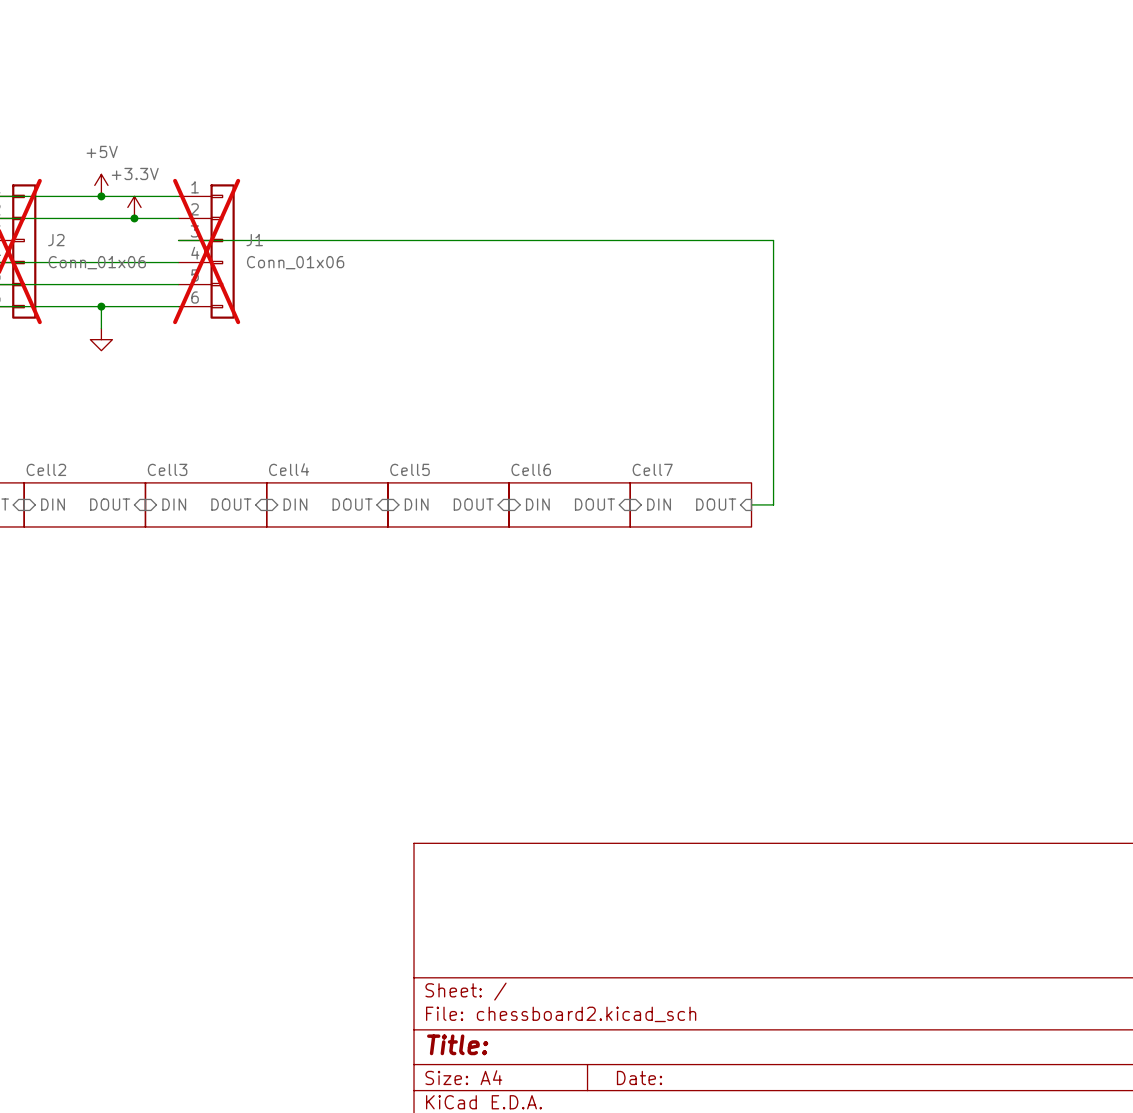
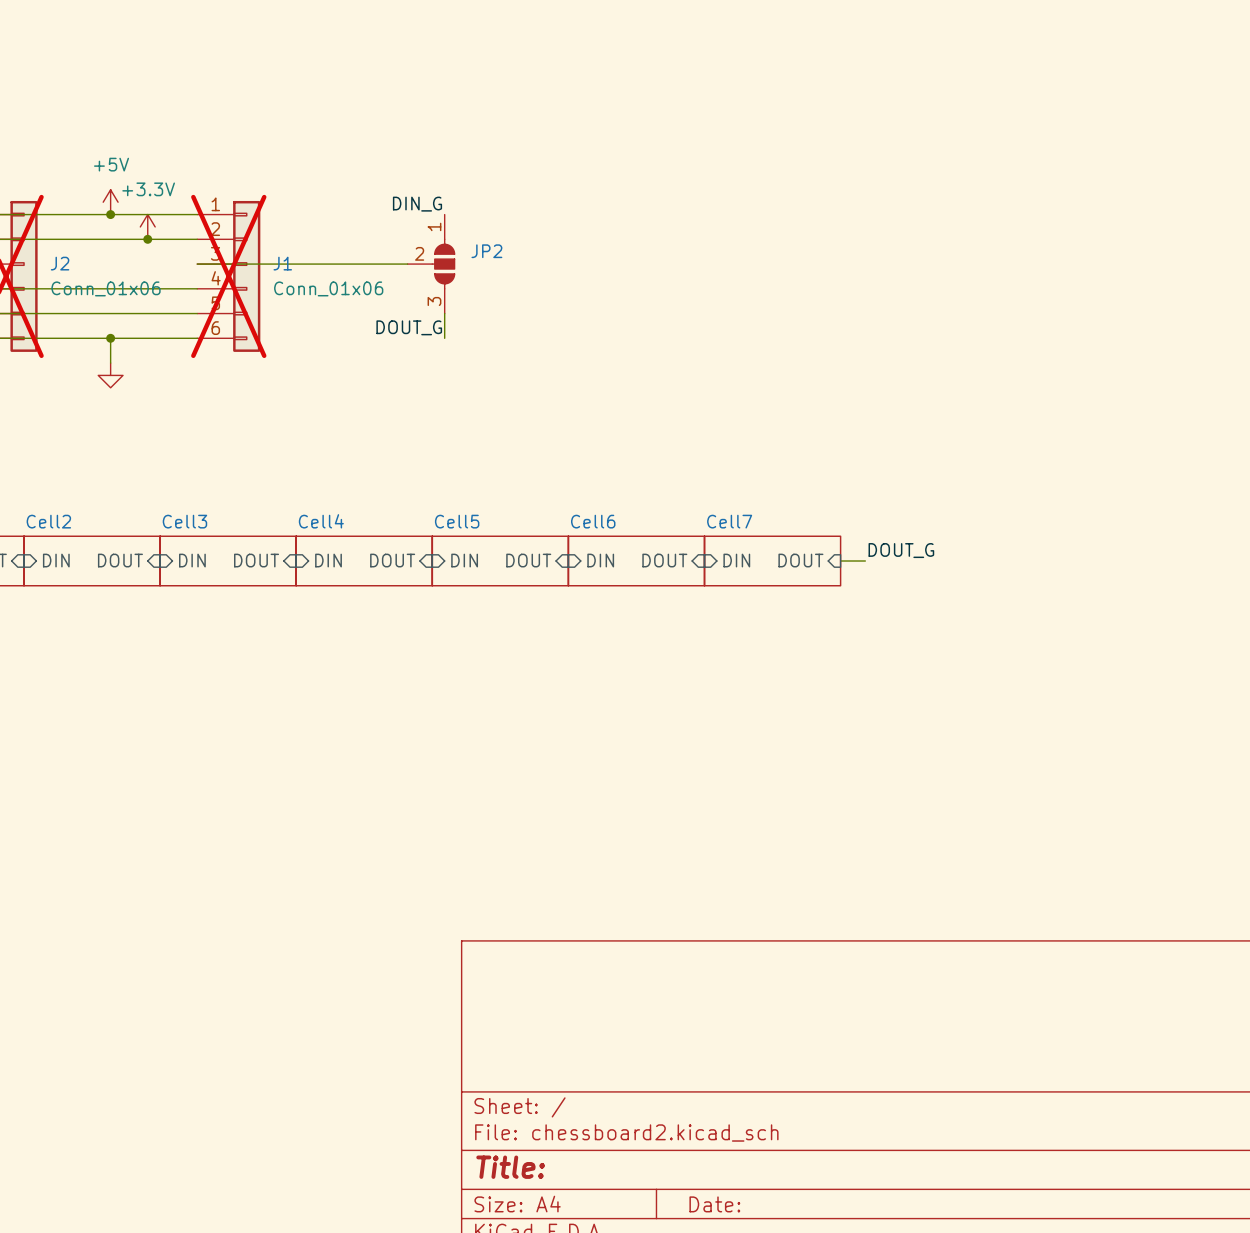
label: none -> DIN_G (417, 204)
wire: (365, 240) (773, 240) (773, 504) -> none
JP2: none -> (431, 264)
wire: none -> (444, 313) (444, 338)
label: none -> DOUT_G (409, 327)
label: none -> DOUT_G (901, 550)

